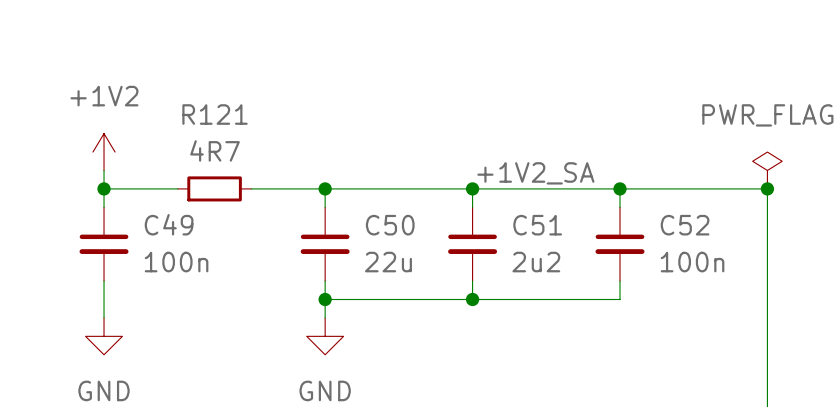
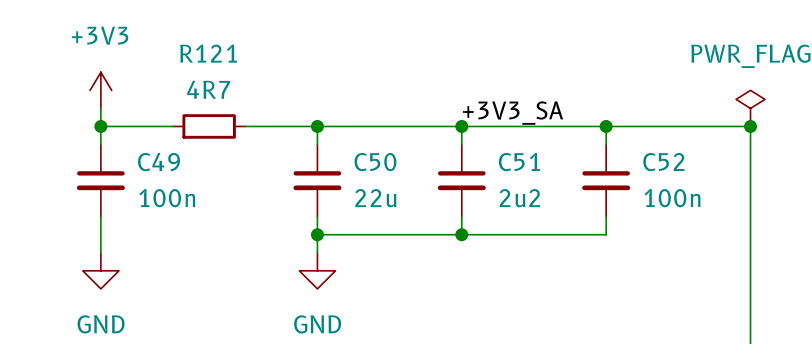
power symbol: +1V2 (104, 152) -> +3V3 (100, 90)
label: +1V2_SA (535, 173) -> +3V3_SA (513, 113)

